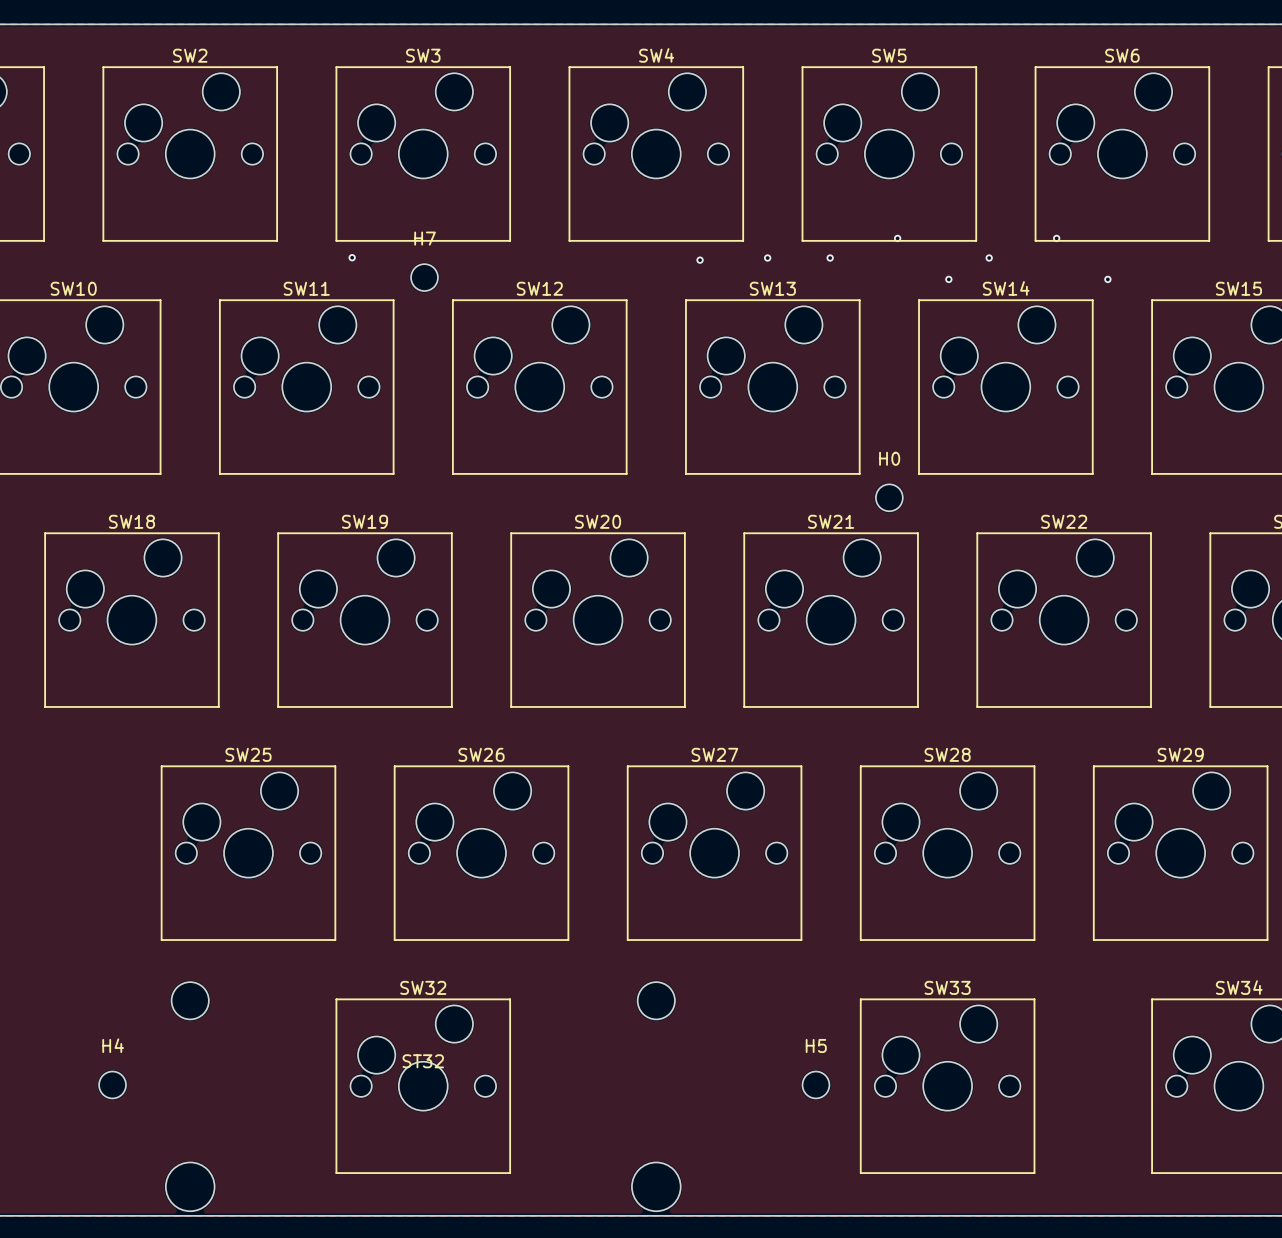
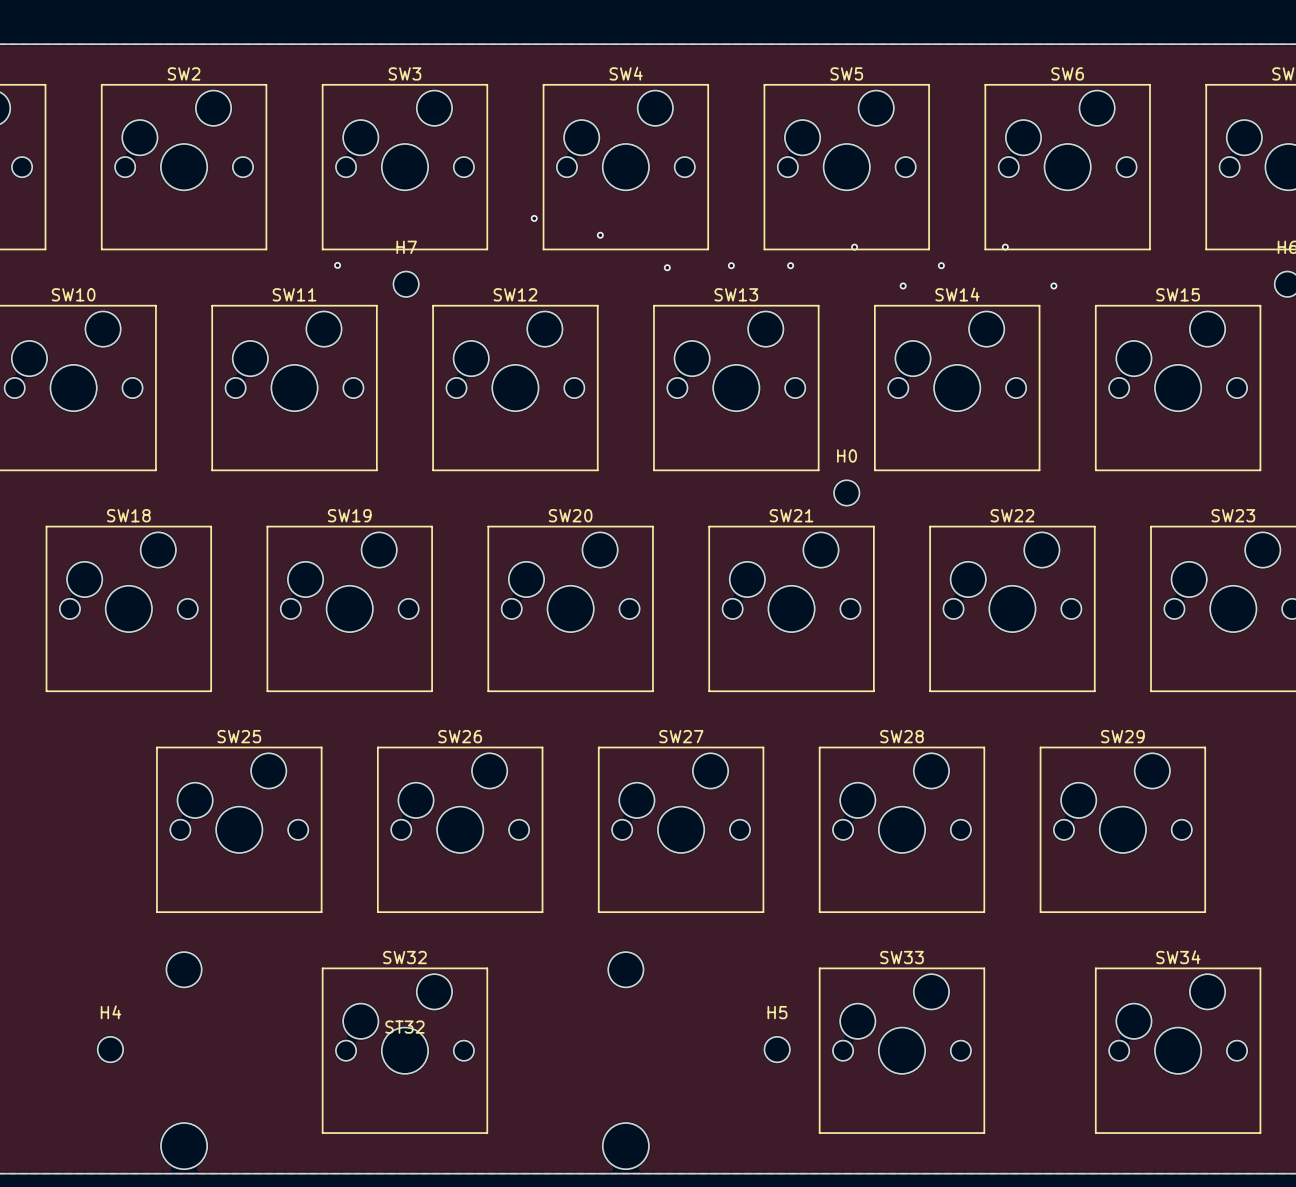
via: none -> (534, 218)
via: none -> (600, 235)

